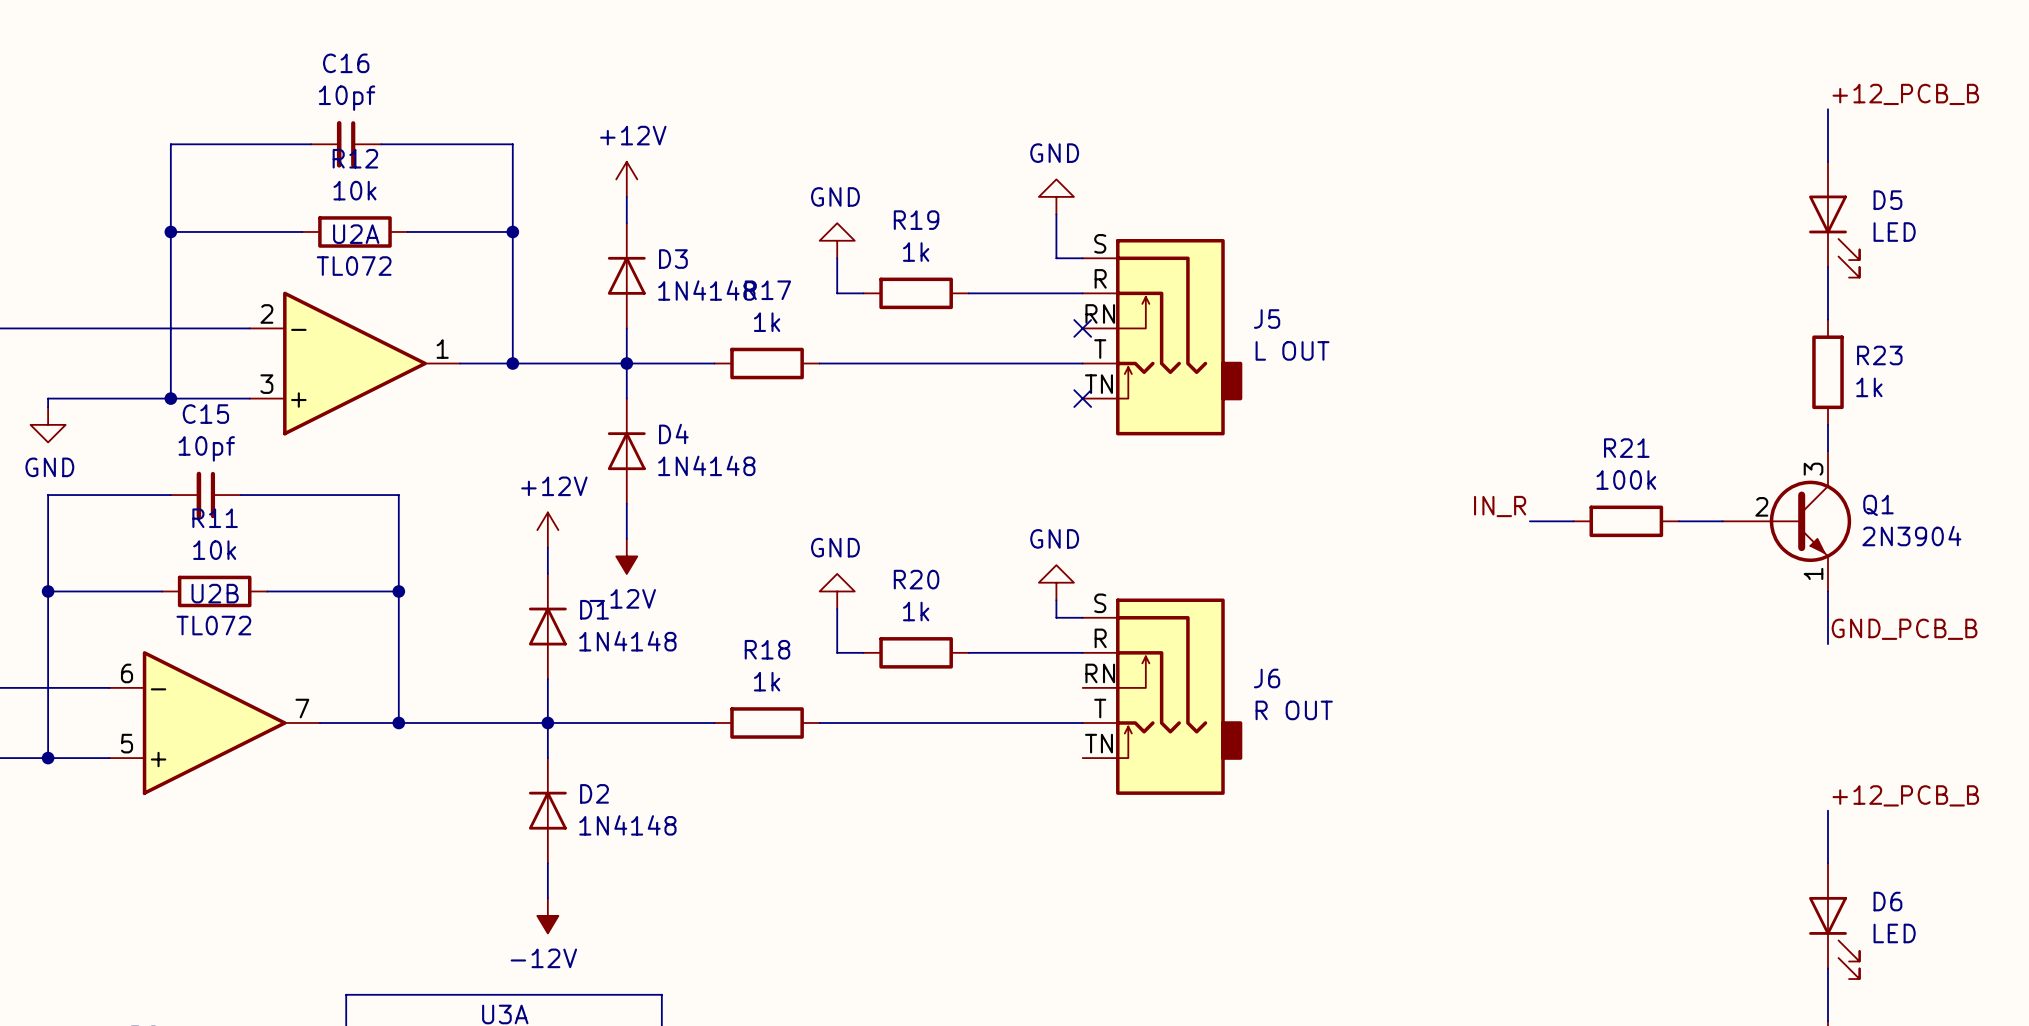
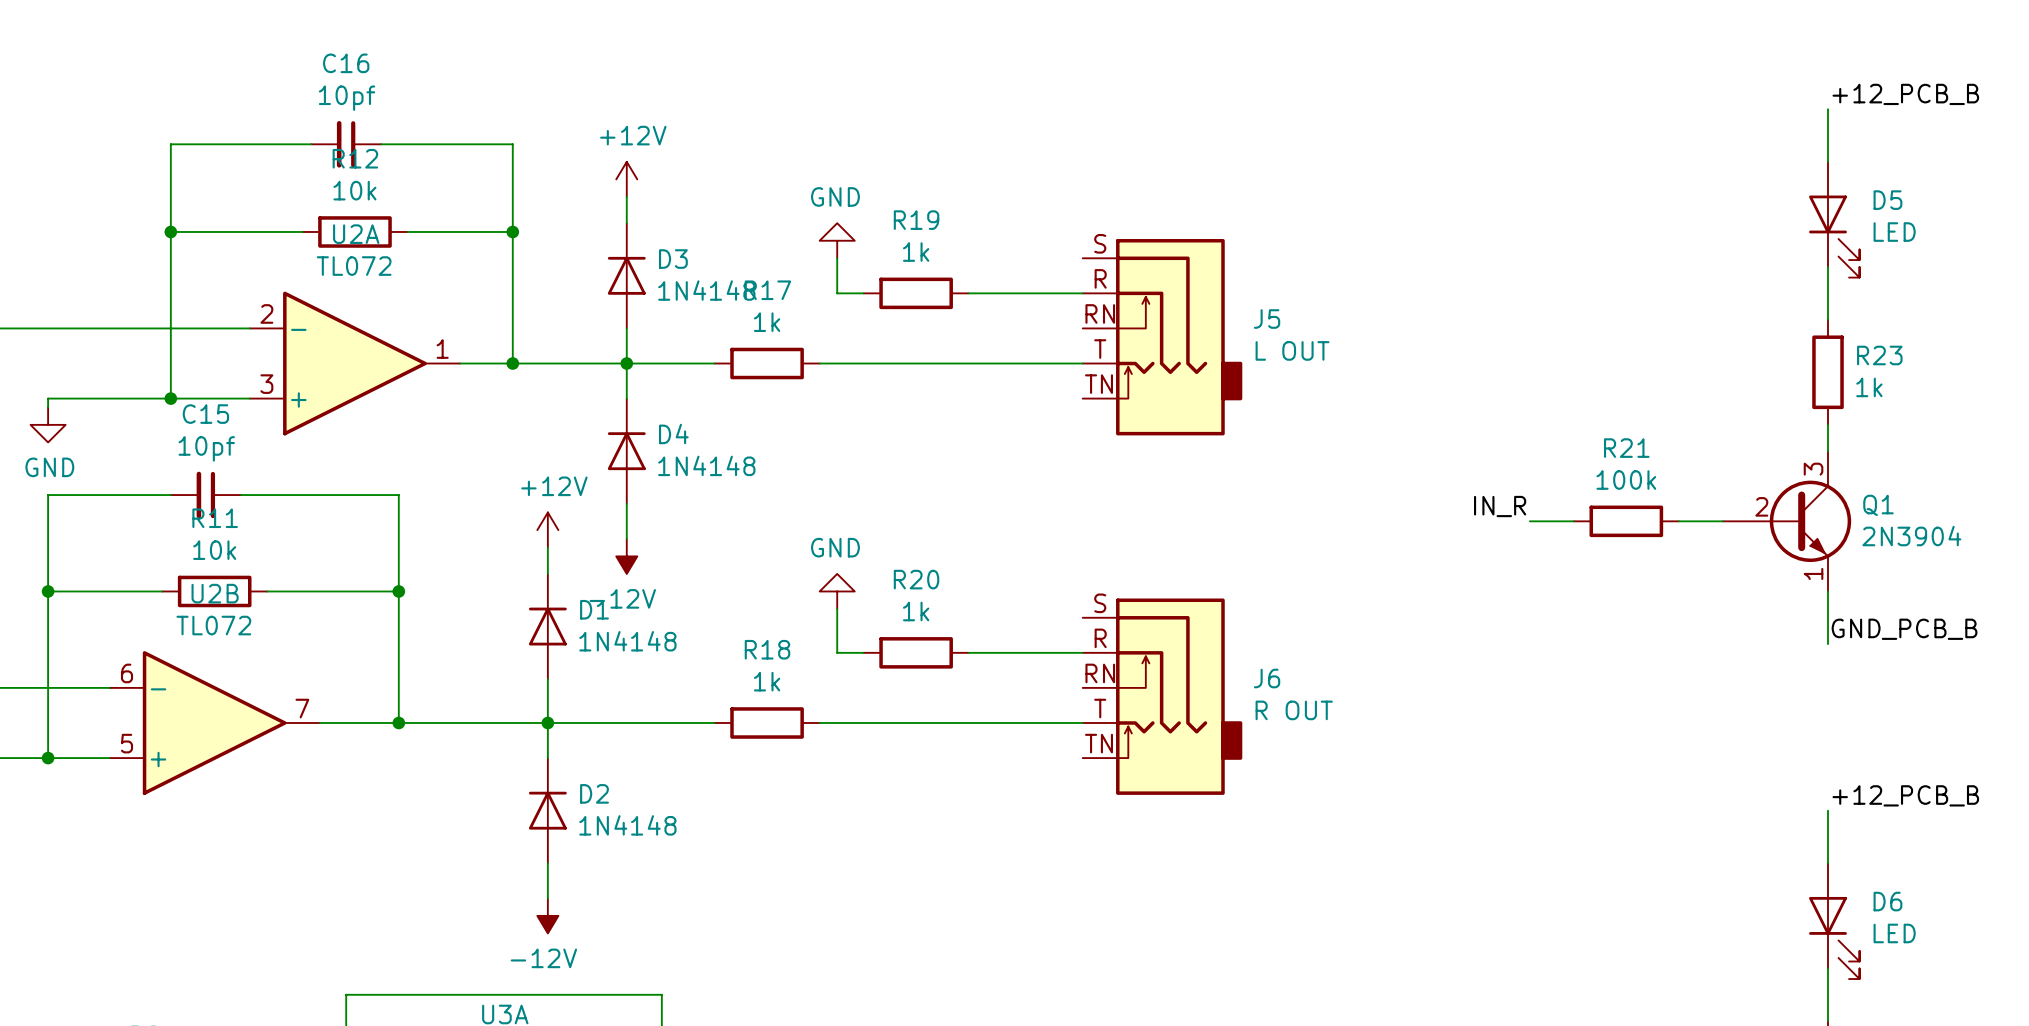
power symbol: GND (1056, 196) -> none
wire: (1056, 214) (1056, 258) (1082, 258) -> none
no-connect mark: (1082, 328) -> none
no-connect mark: (1082, 398) -> none
power symbol: GND (1056, 582) -> none
wire: (1056, 600) (1056, 617) (1082, 617) -> none

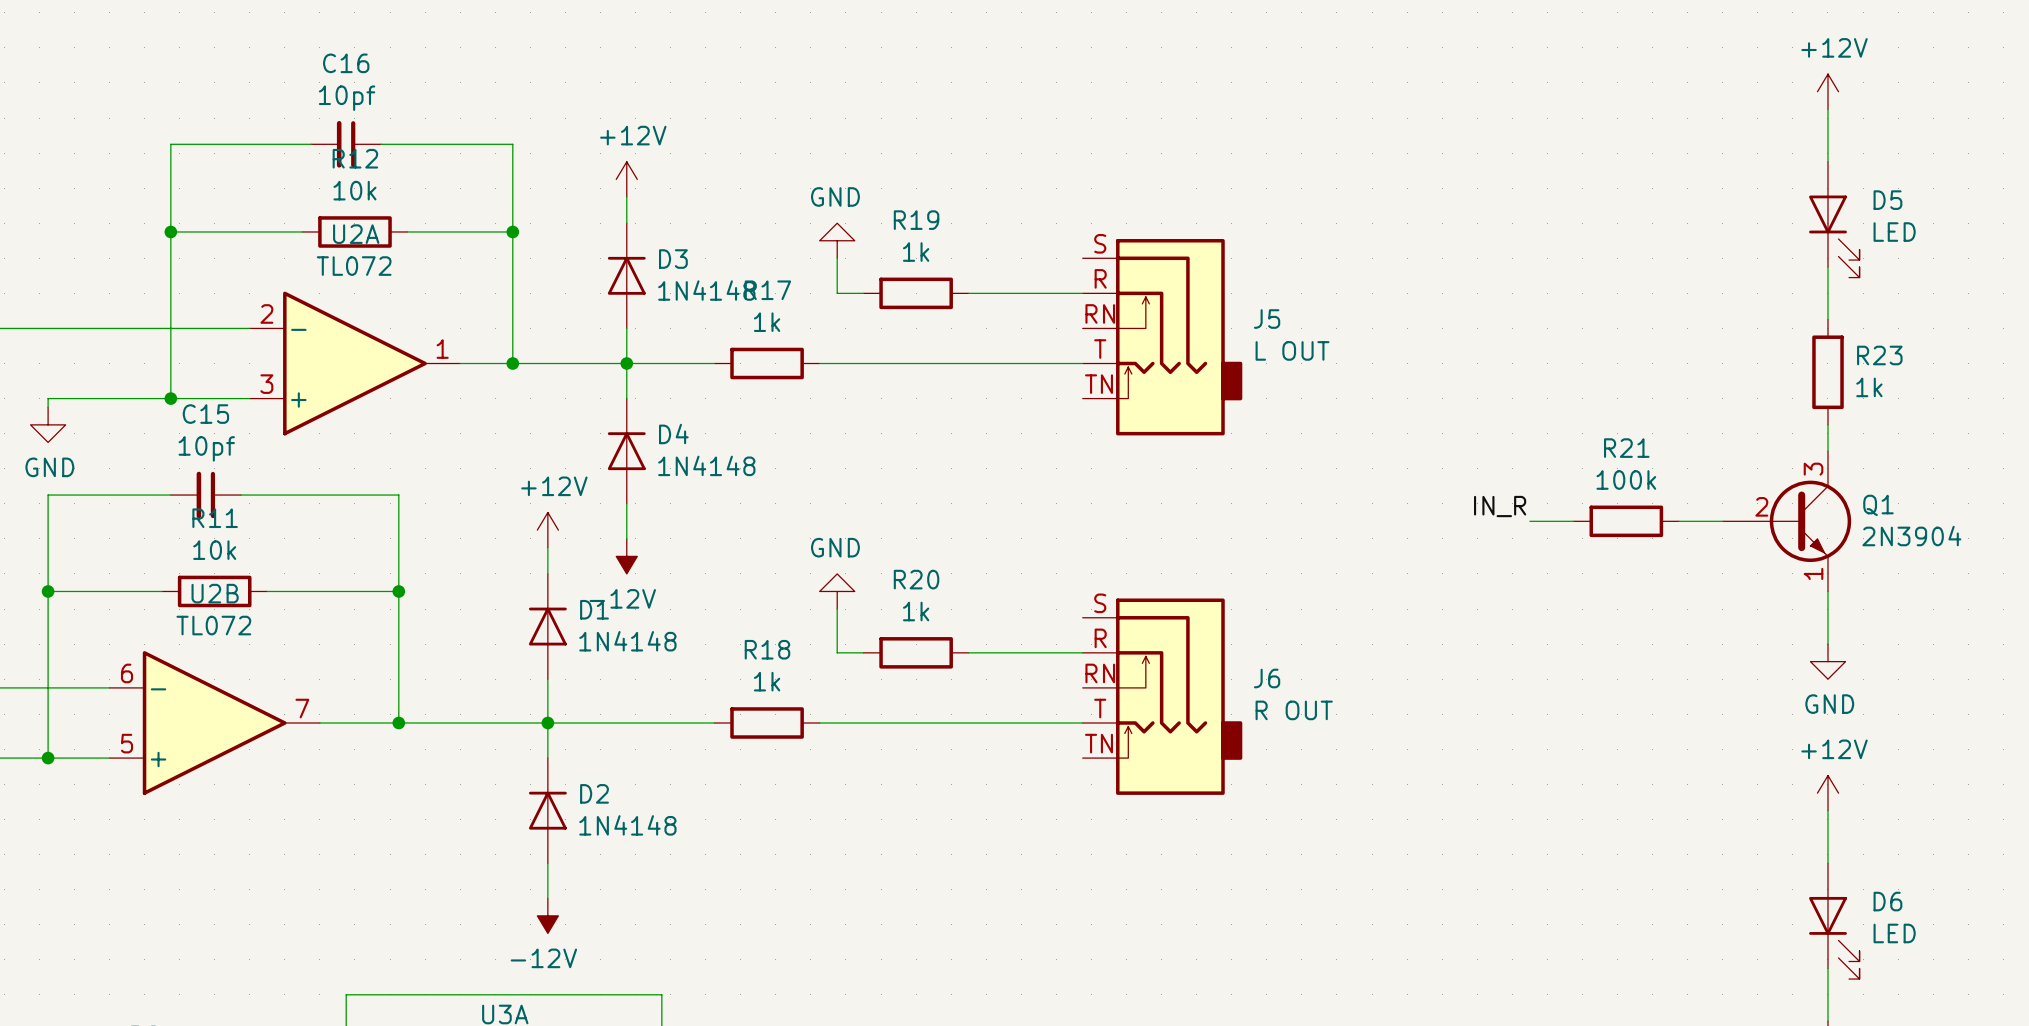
power symbol: none -> +12V (1827, 91)
label: +12_PCB_B (1905, 94) -> none
label: GND_PCB_B (1904, 629) -> none
power symbol: none -> GND (1827, 661)
power symbol: none -> +12V (1827, 793)
label: +12_PCB_B (1905, 795) -> none

